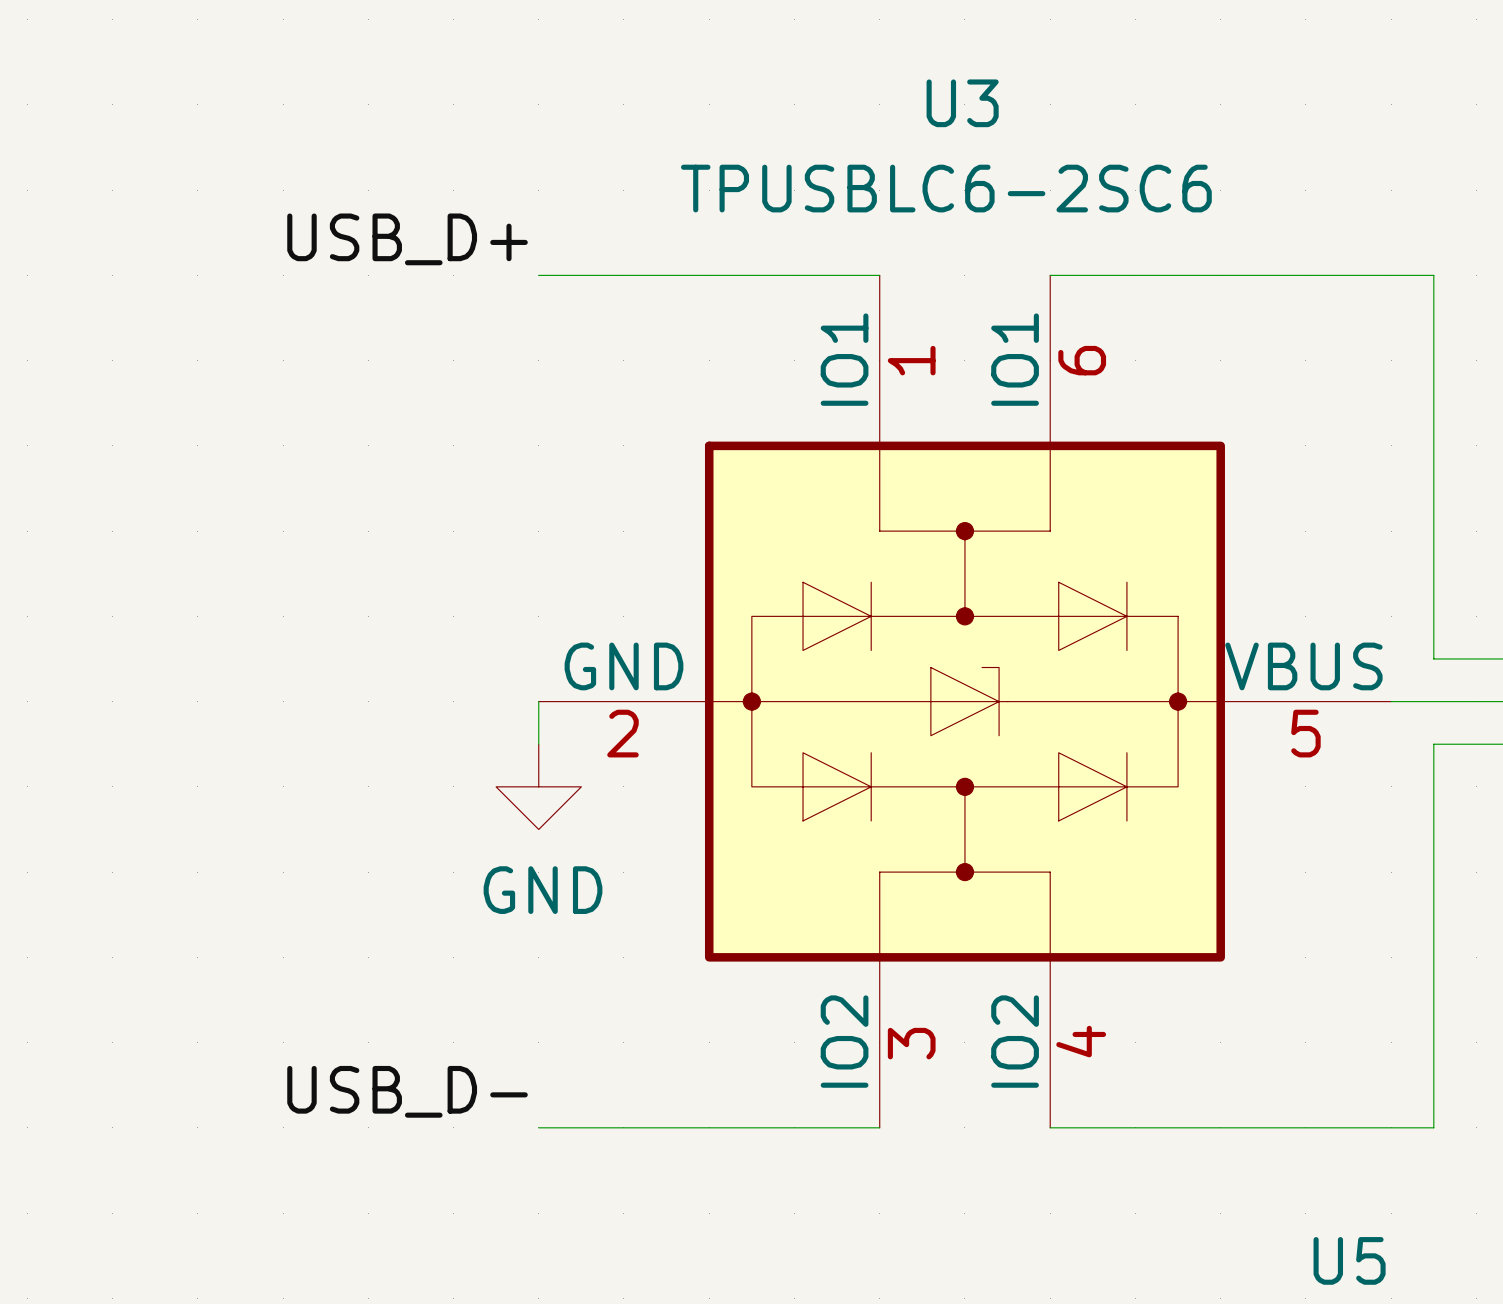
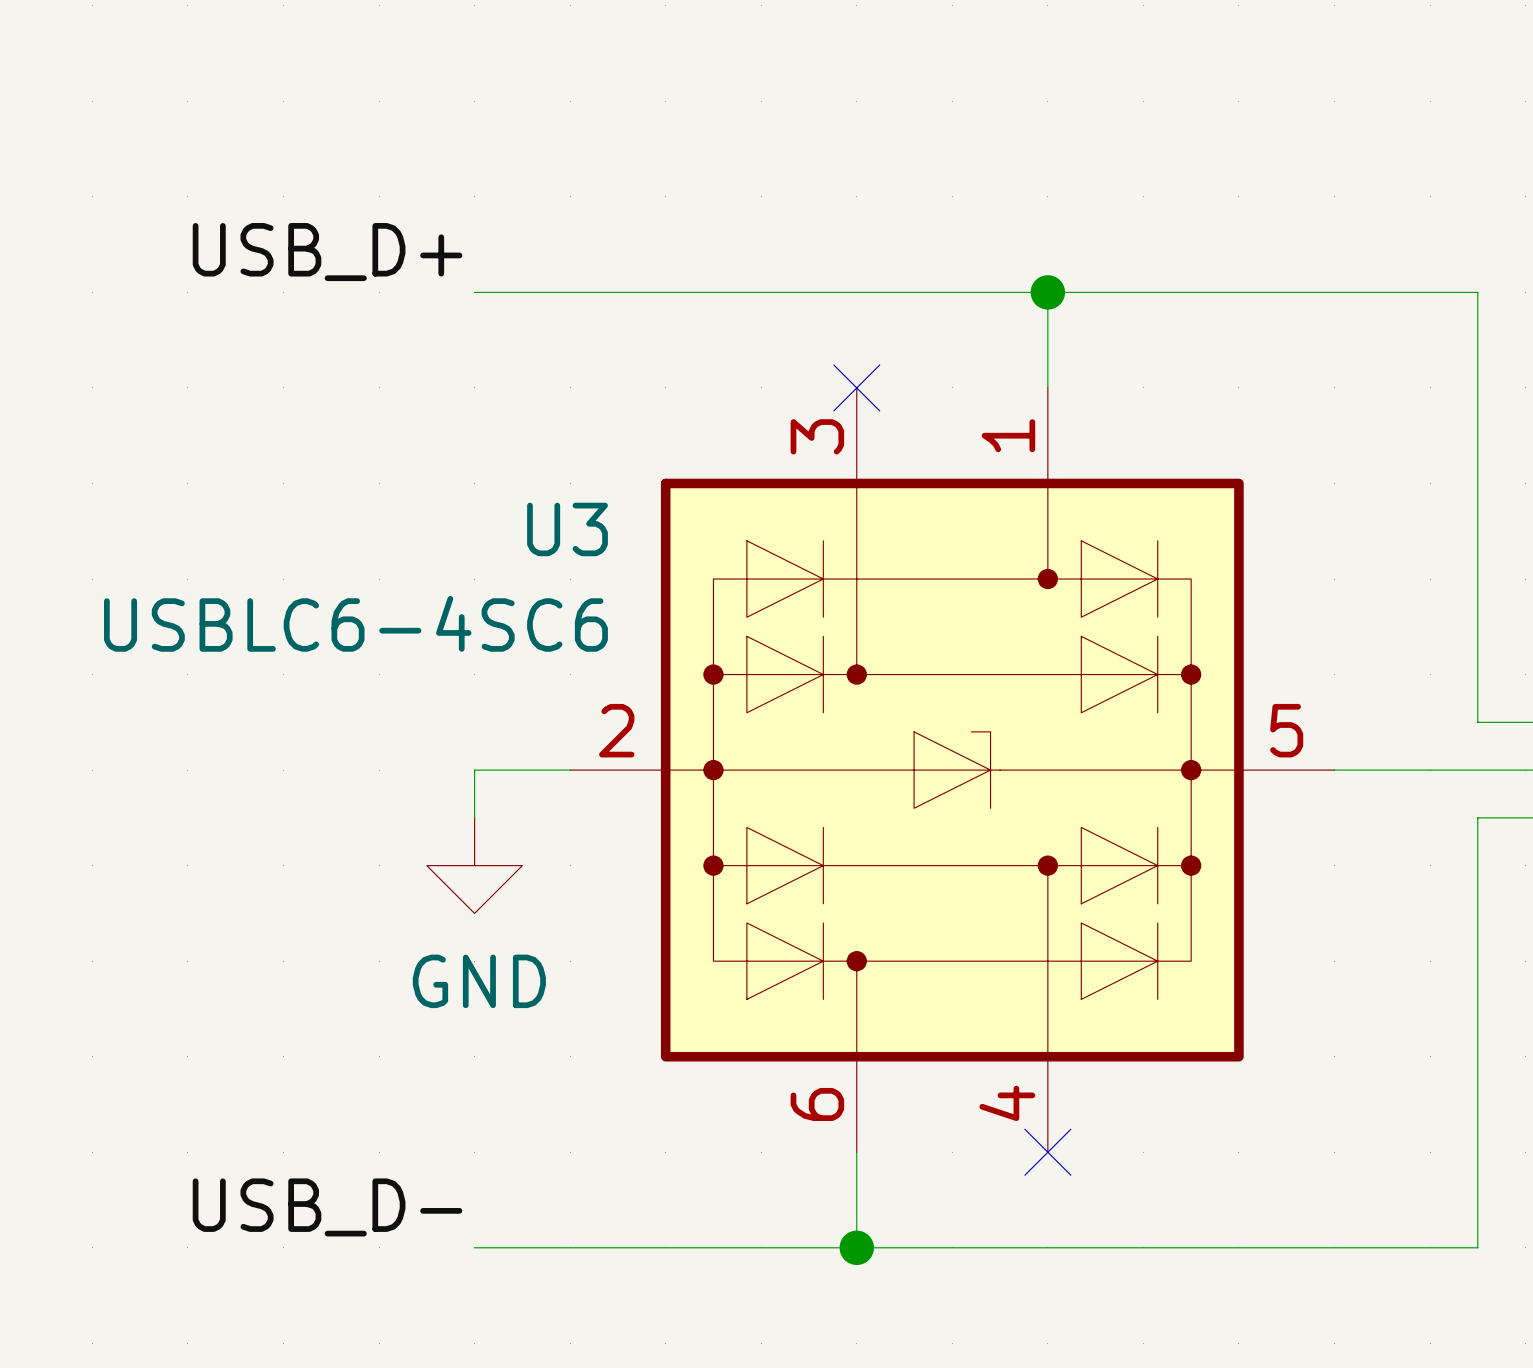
U3 name position: U3 (962, 103) -> U3 (567, 529)
U3 value: TPUSBLC6-2SC6 (946, 188) -> USBLC6-4SC6 (355, 623)
U3 symbol: [538, 275, 1392, 1128] -> [570, 387, 1335, 1153]
wire: none -> (856, 292) (1047, 292) (1047, 387)
junction: none -> (1047, 292)
no-connect mark: none -> (856, 387)
wire: none -> (856, 1152) (856, 1247) (1047, 1247)
no-connect mark: none -> (1047, 1152)
junction: none -> (856, 1247)

